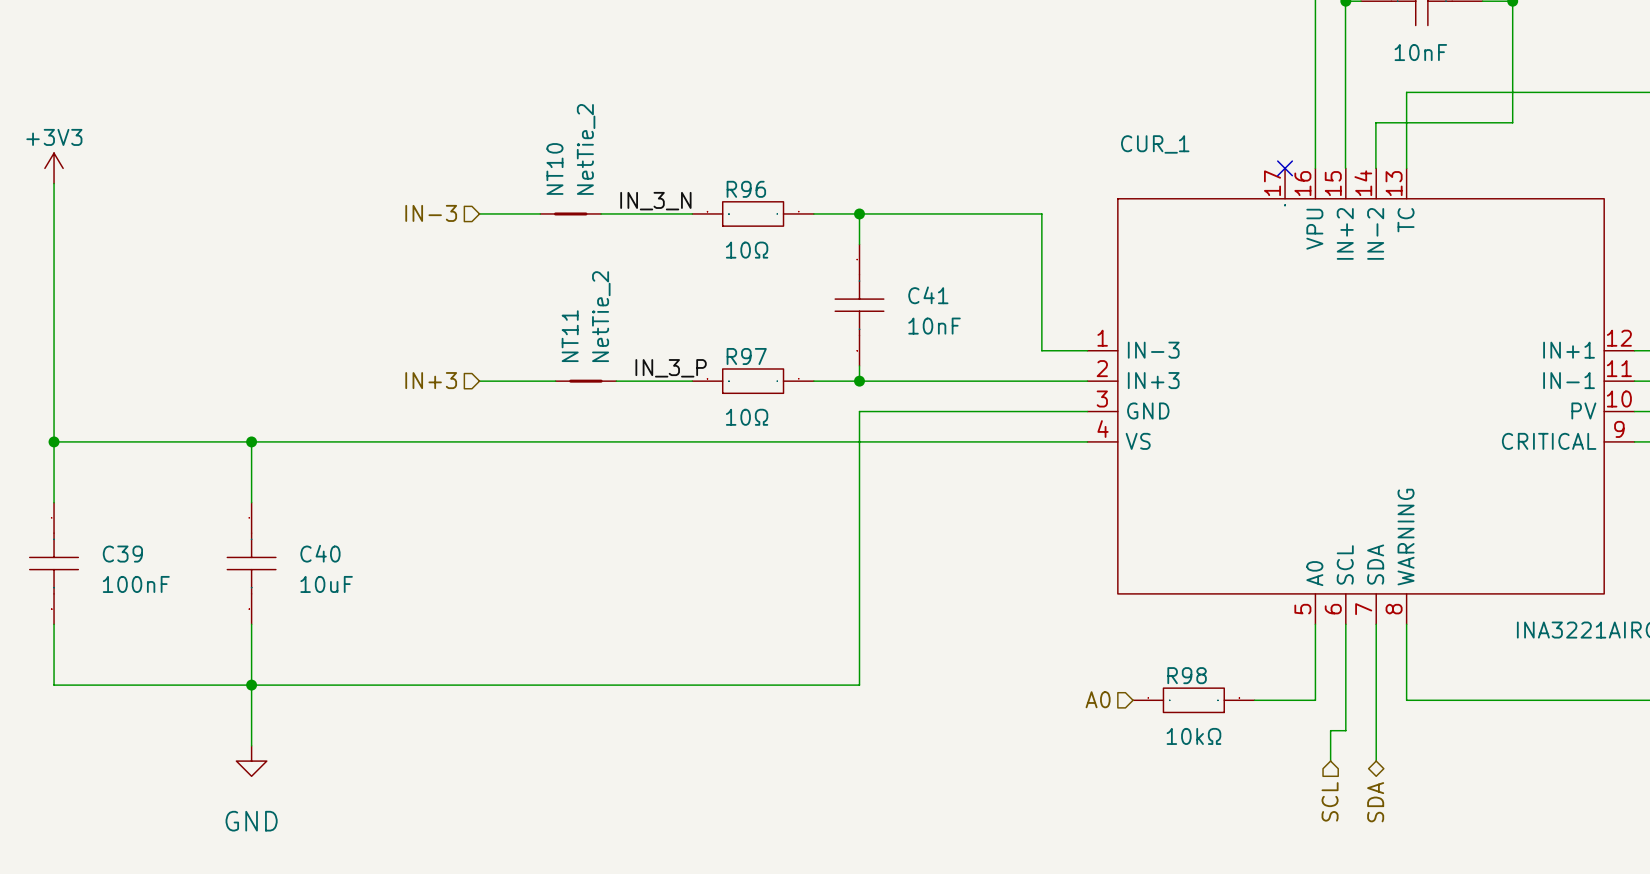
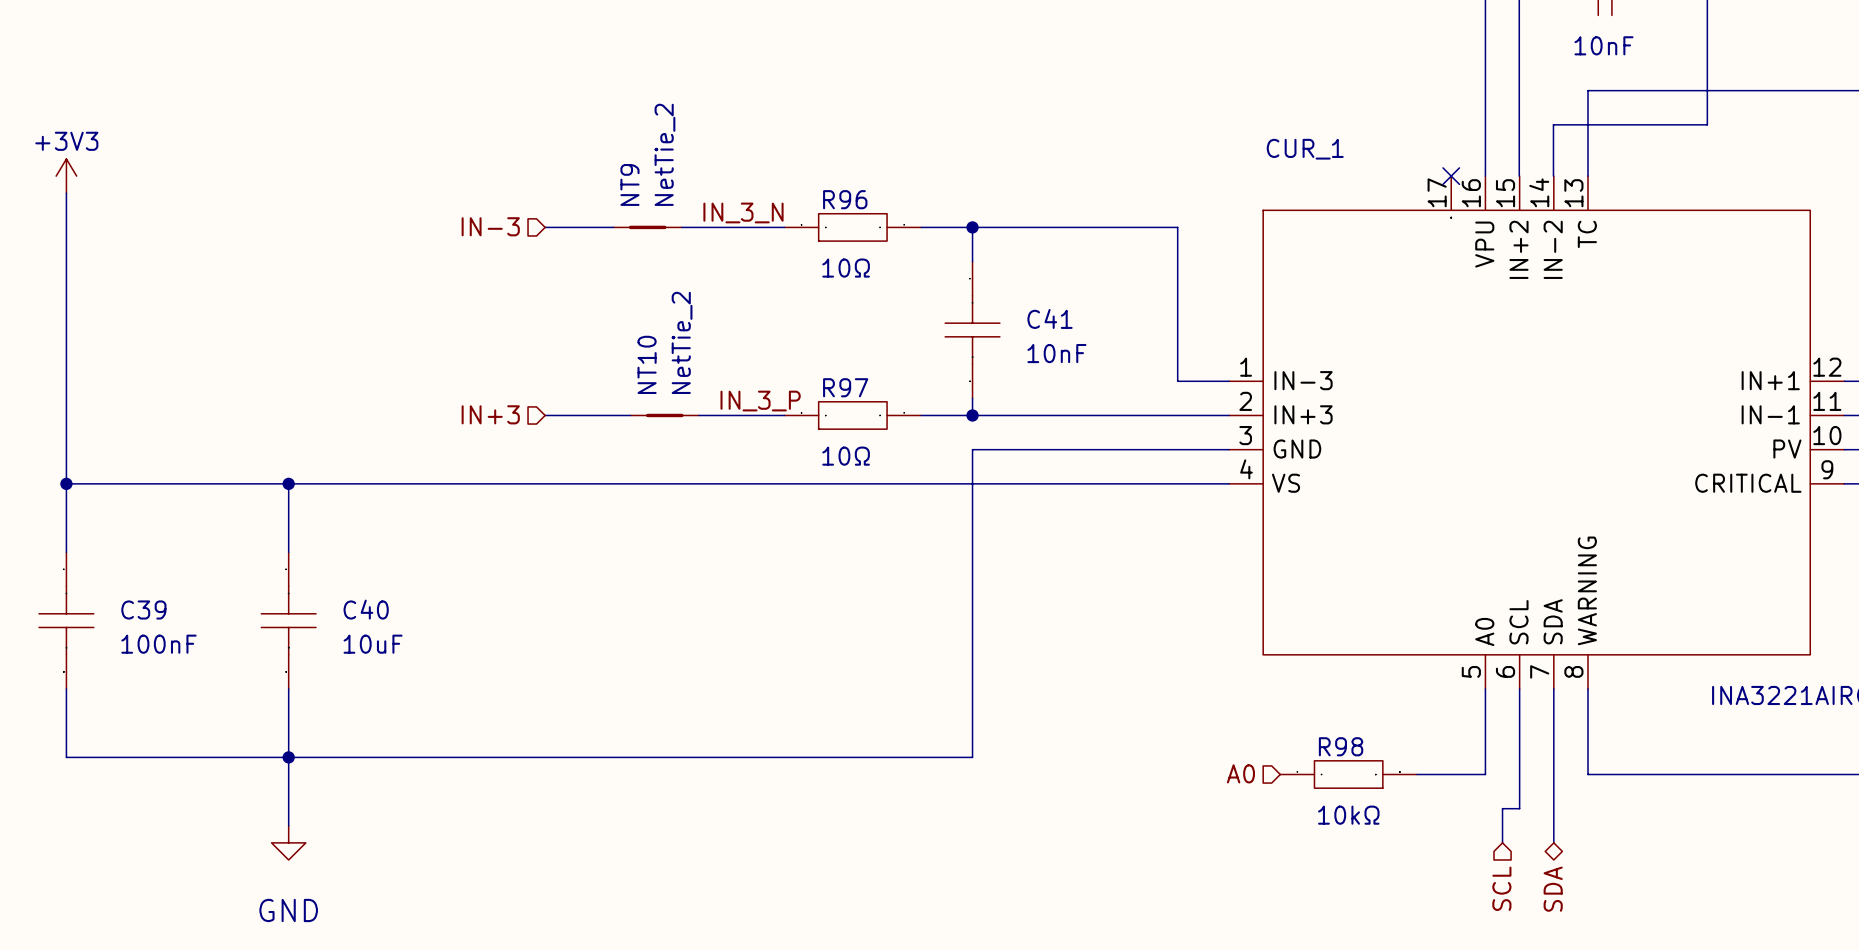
NT10 name: NT10 (554, 168) -> NT9 (629, 184)
NT11 name: NT11 (570, 336) -> NT10 (647, 364)

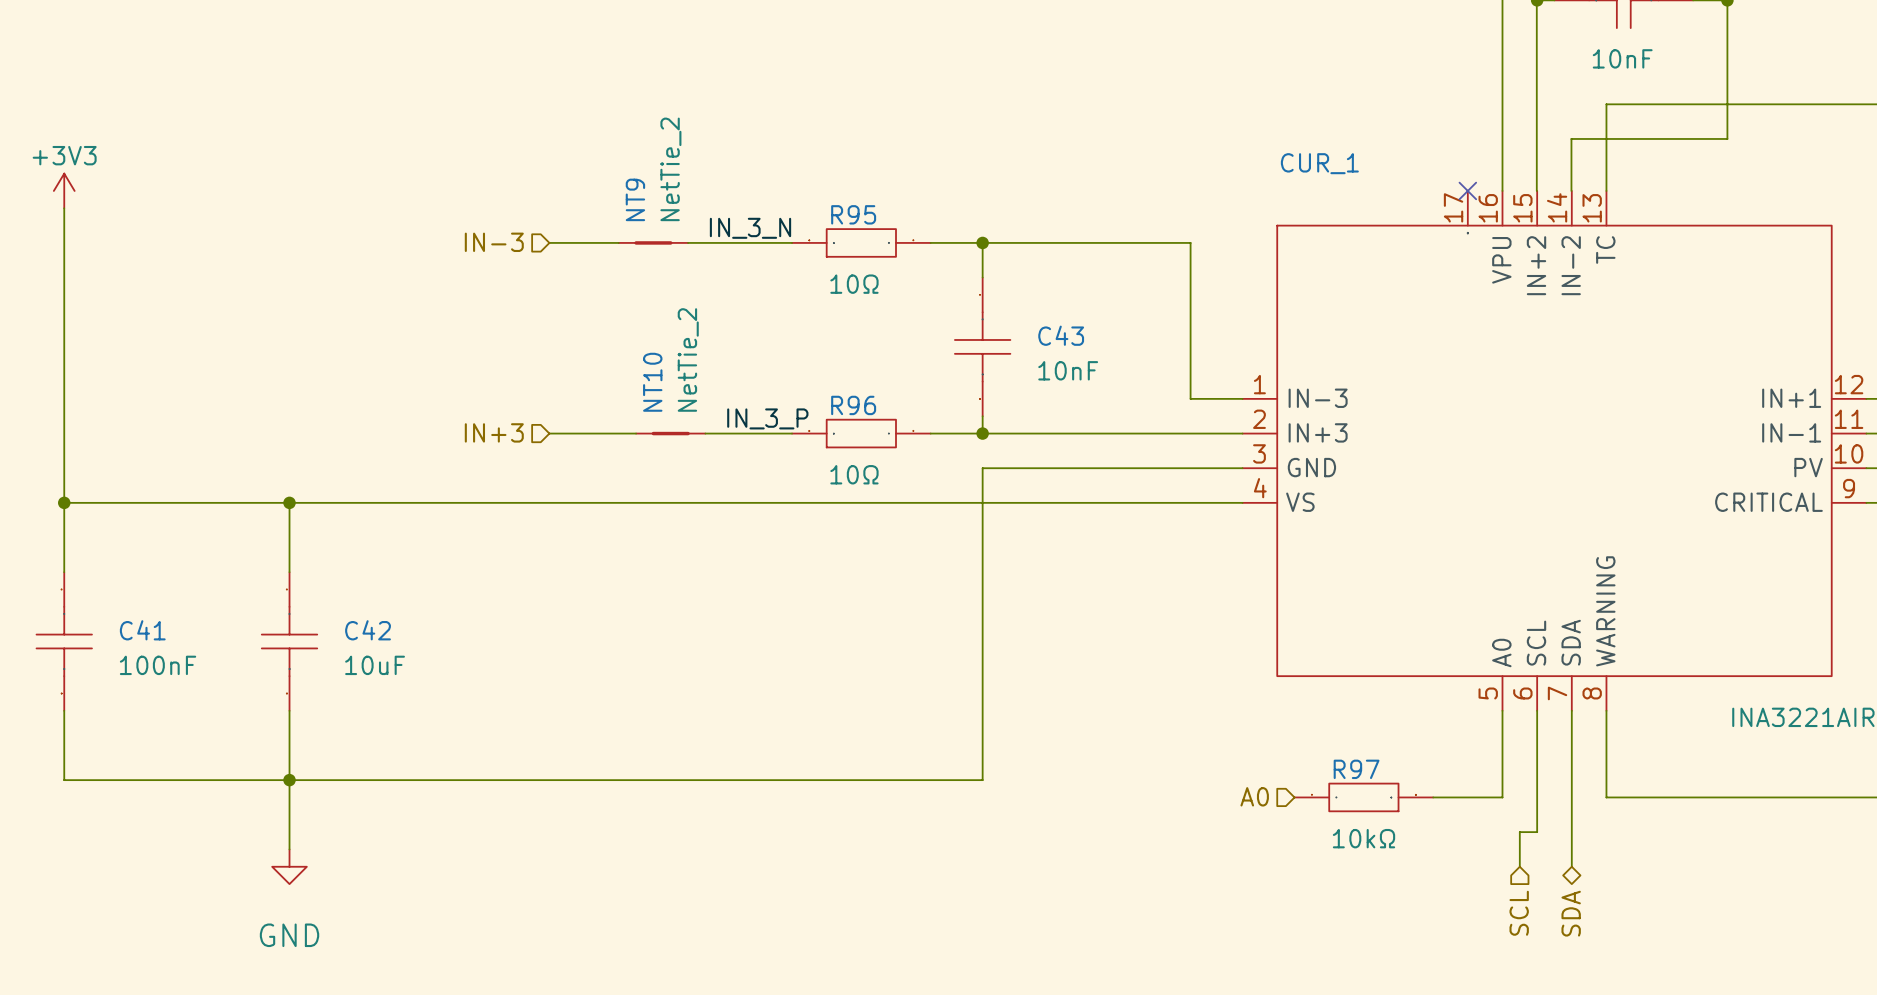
R96 name: R96 (845, 199) -> R95 (853, 214)
C41 name: C41 (1050, 318) -> C43 (1061, 335)
R97 name: R97 (845, 387) -> R96 (853, 405)
C39 name: C39 (143, 609) -> C41 (142, 630)
C40 name: C40 (366, 609) -> C42 (368, 630)
R98 name: R98 (1341, 746) -> R97 (1356, 769)

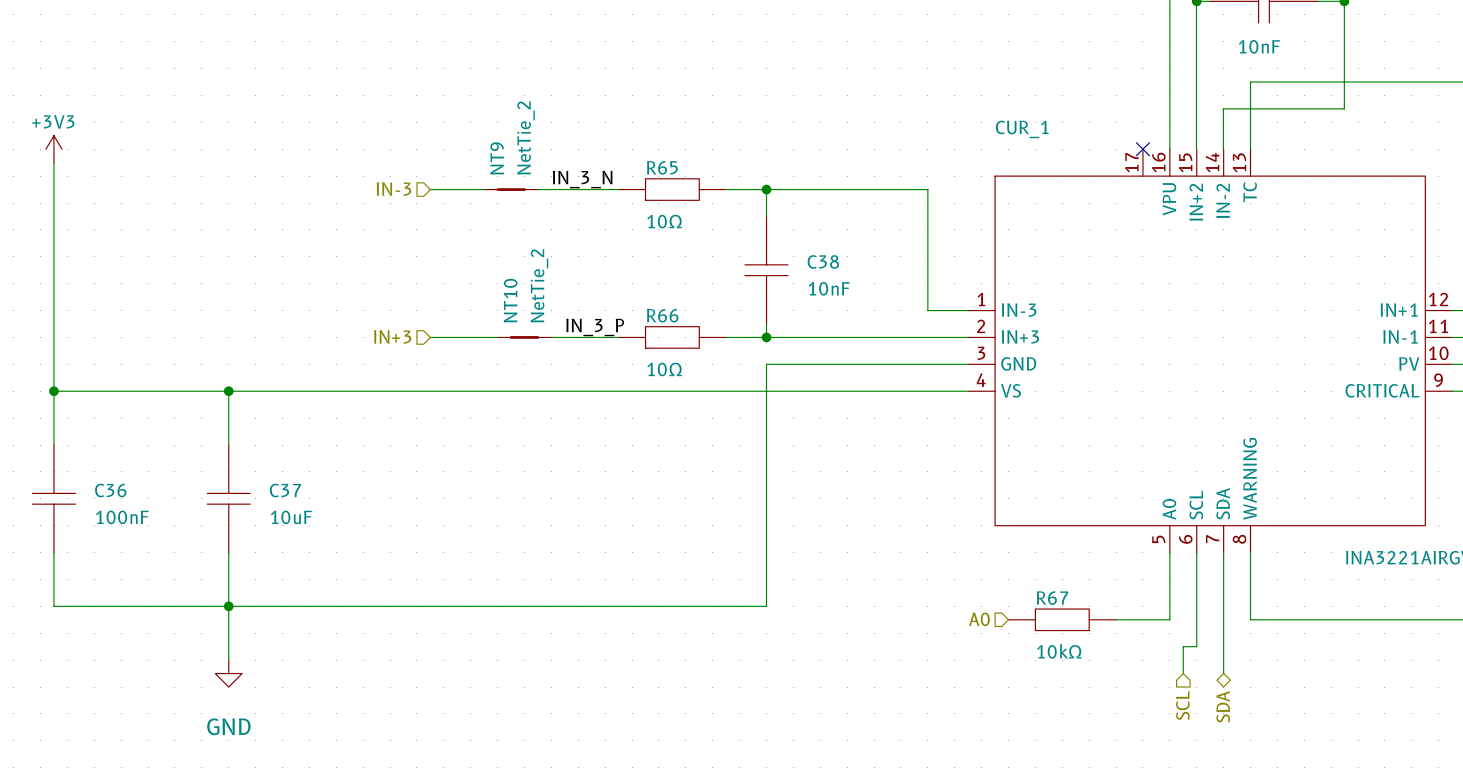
R95 name: R95 (853, 214) -> R65 (662, 167)
C43 name: C43 (1061, 335) -> C38 (823, 261)
R96 name: R96 (853, 405) -> R66 (662, 315)
C41 name: C41 (142, 630) -> C36 (110, 490)
C42 name: C42 (368, 630) -> C37 (285, 490)
R97 name: R97 (1356, 769) -> R67 (1052, 598)

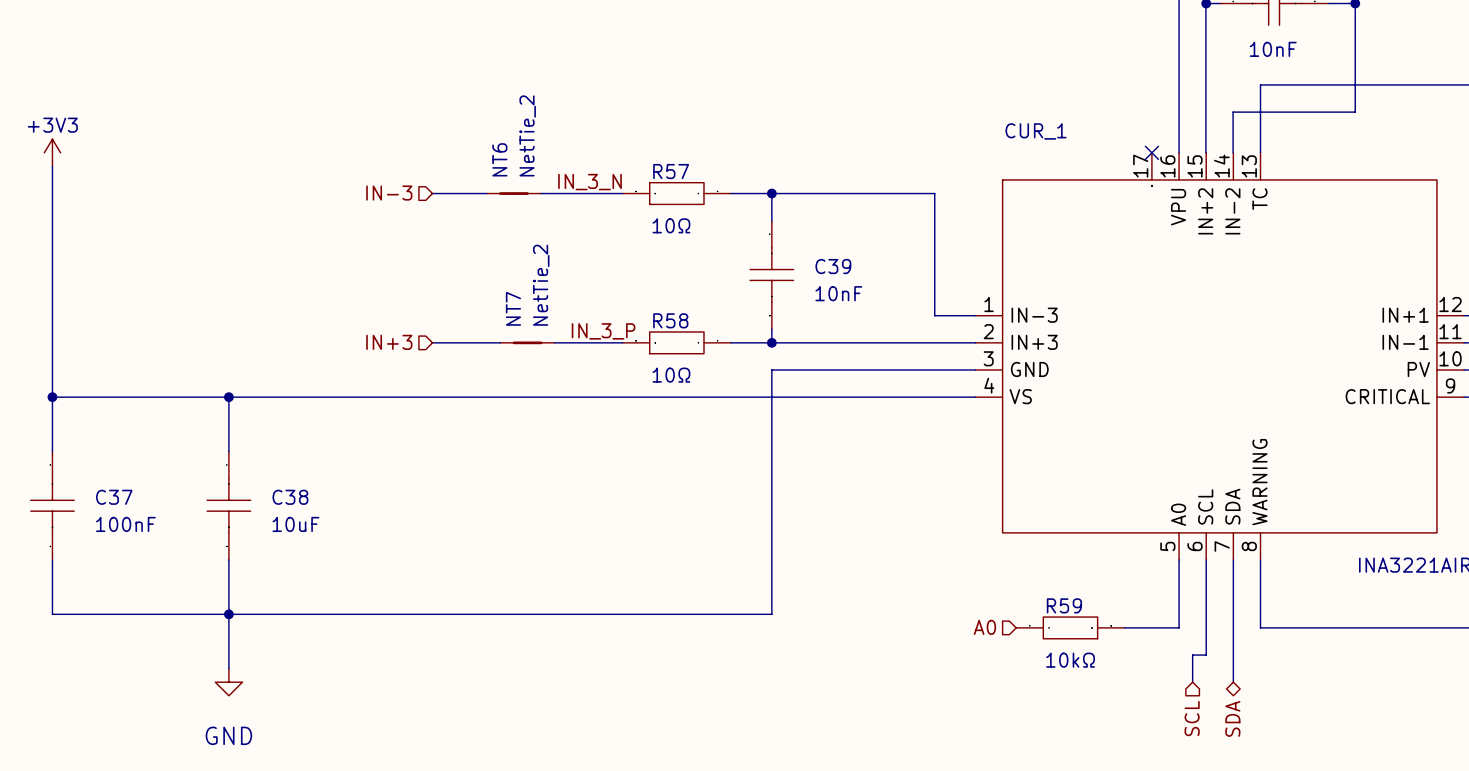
NT9 name: NT9 (497, 158) -> NT6 (499, 159)
R65 name: R65 (662, 167) -> R57 (671, 171)
C38 name: C38 (823, 261) -> C39 (833, 266)
NT10 name: NT10 (510, 300) -> NT7 (513, 308)
R66 name: R66 (662, 315) -> R58 (670, 320)
C36 name: C36 (110, 490) -> C37 (114, 497)
C37 name: C37 (285, 490) -> C38 (290, 497)
R67 name: R67 (1052, 598) -> R59 (1064, 605)

